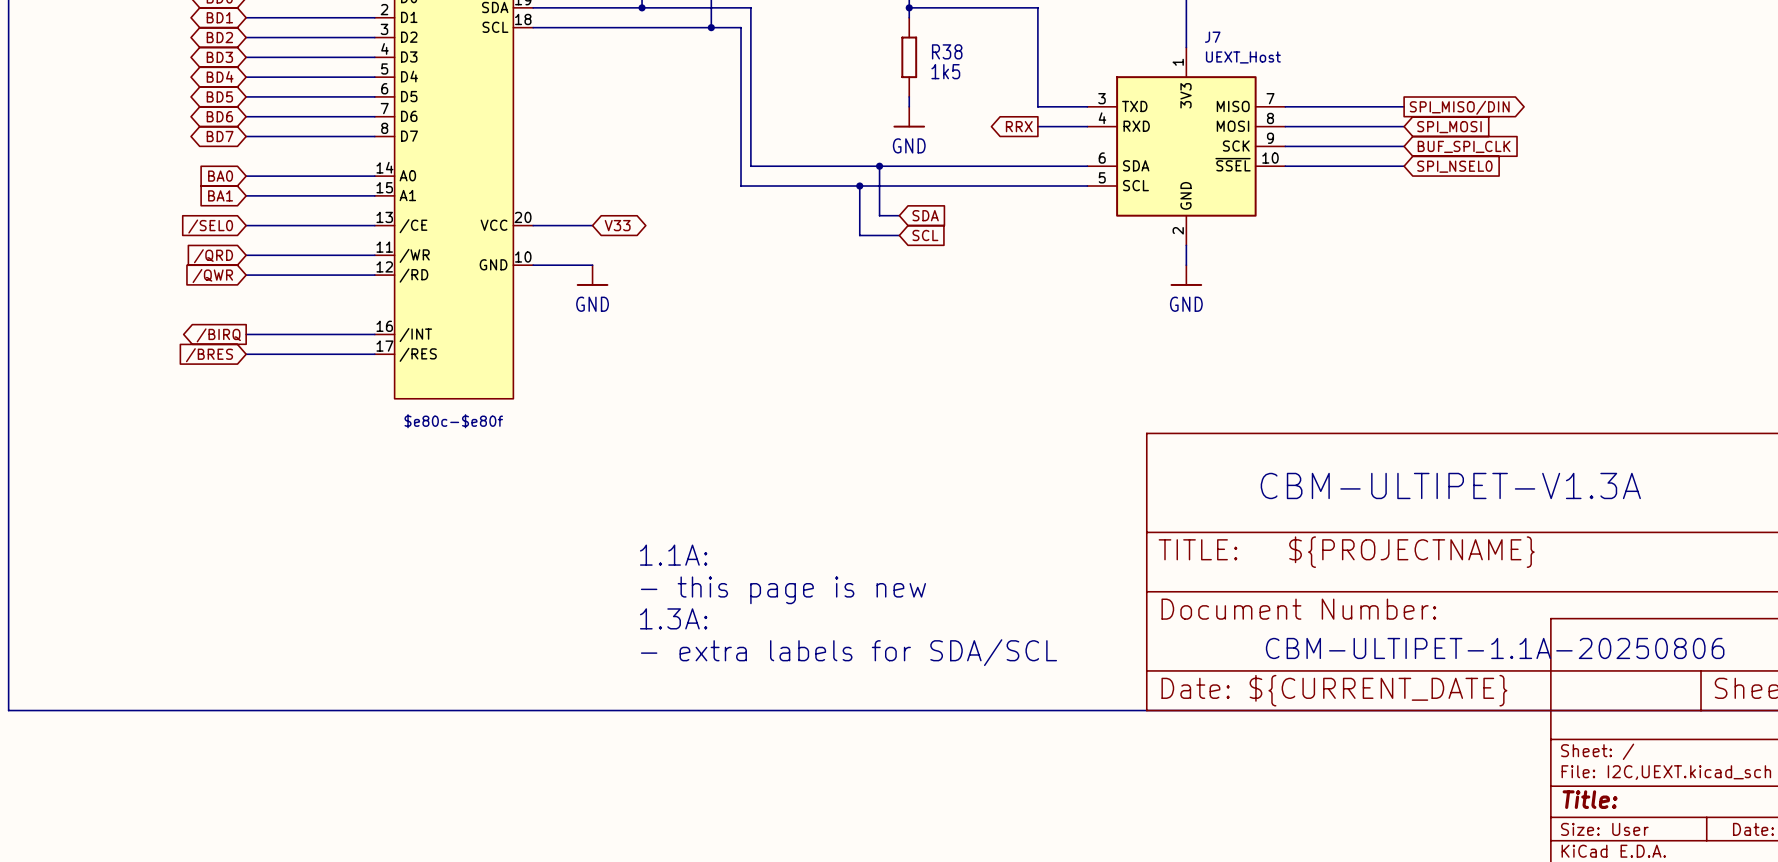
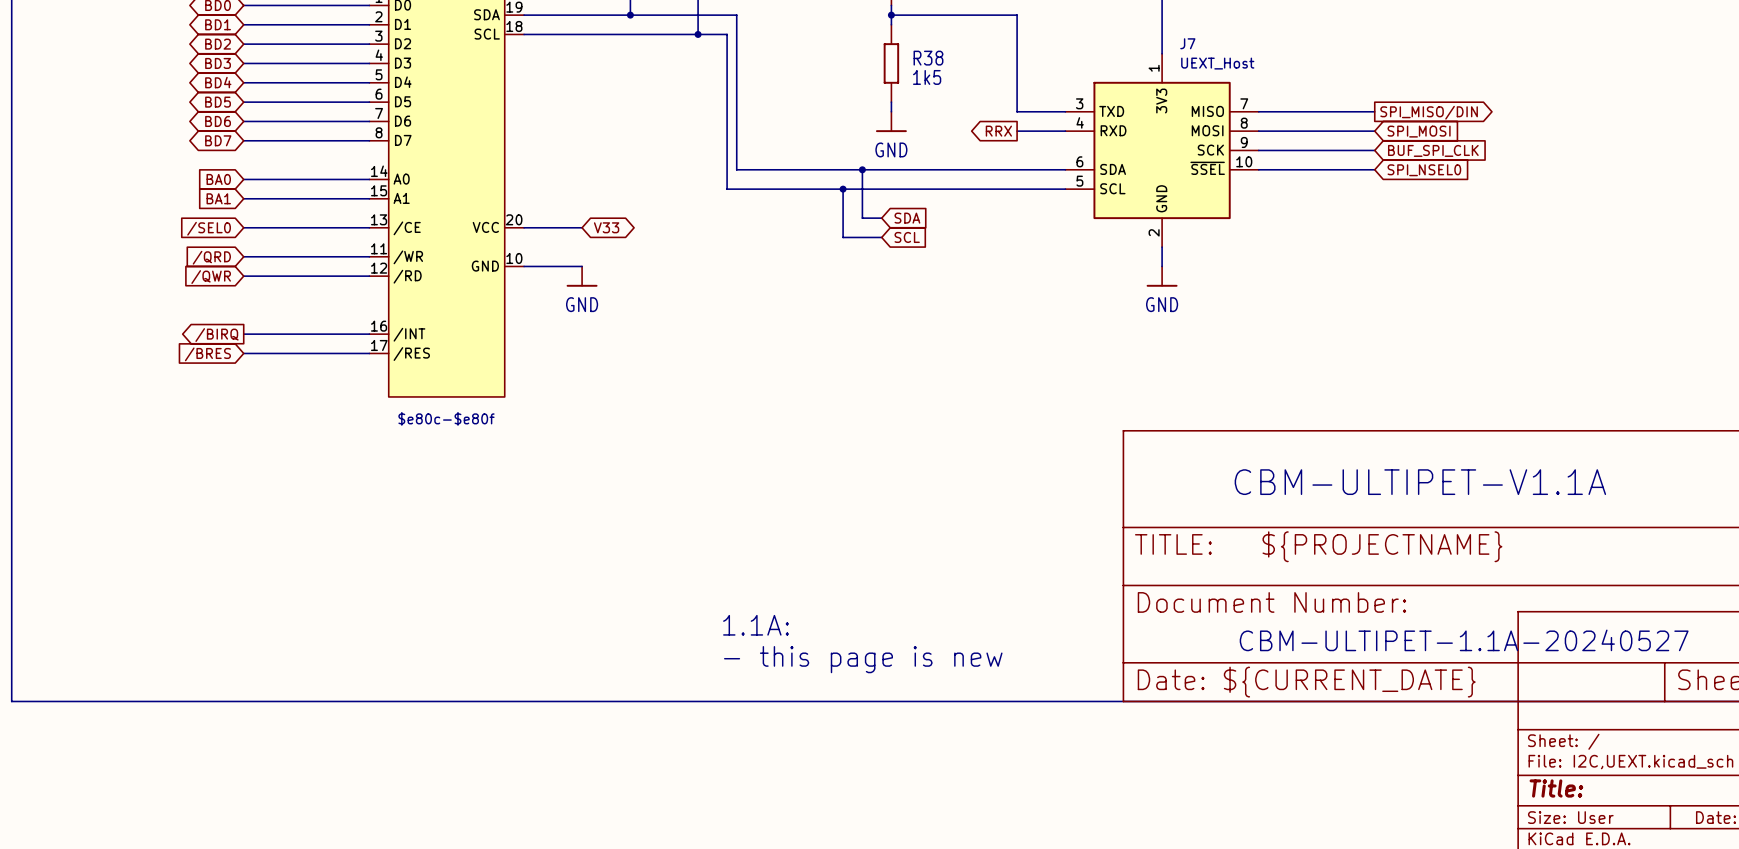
text: CBM-ULTIPET-V1.3A (1450, 485) -> CBM-ULTIPET-V1.1A (1420, 482)
text position: 1.1A: (673, 555) -> 1.1A: (756, 625)
text position: - this page is new (783, 590) -> - this page is new (863, 659)
text: 1.3A: (673, 618) -> none
text: CBM-ULTIPET-1.1A-20250806 (1495, 648) -> CBM-ULTIPET-1.1A-20240527 (1464, 640)
text: - extra labels for SDA/SCL (848, 652) -> none

